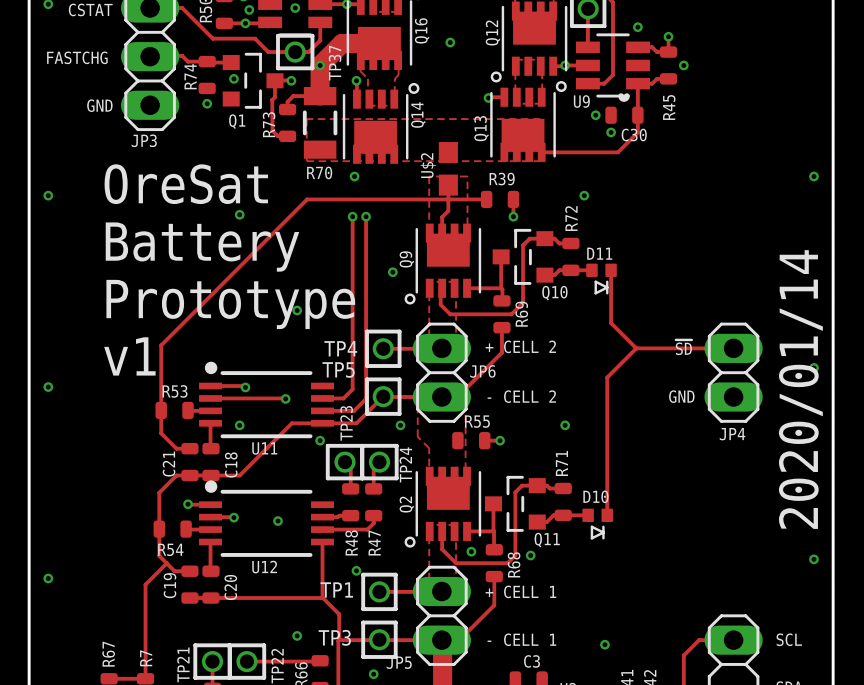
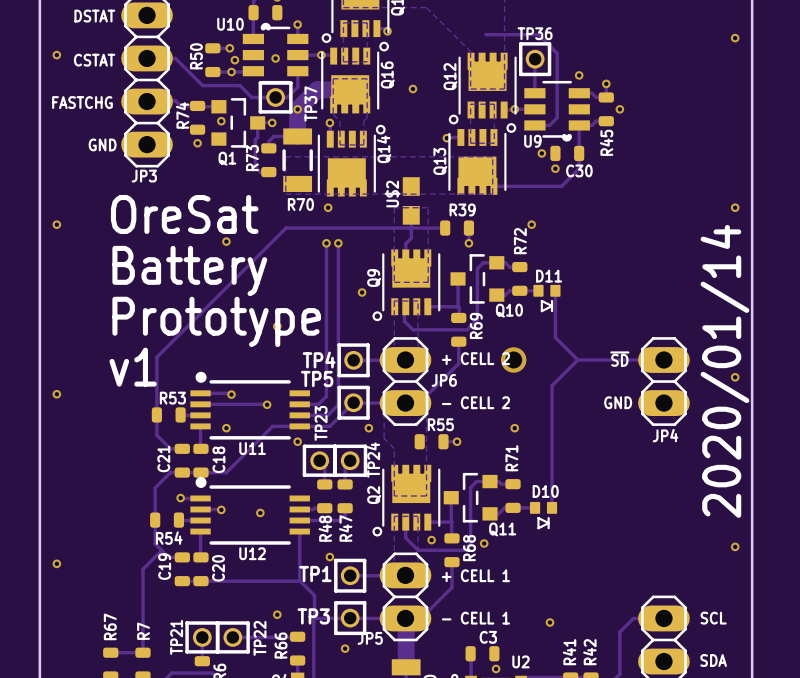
via: none -> (513, 359)

